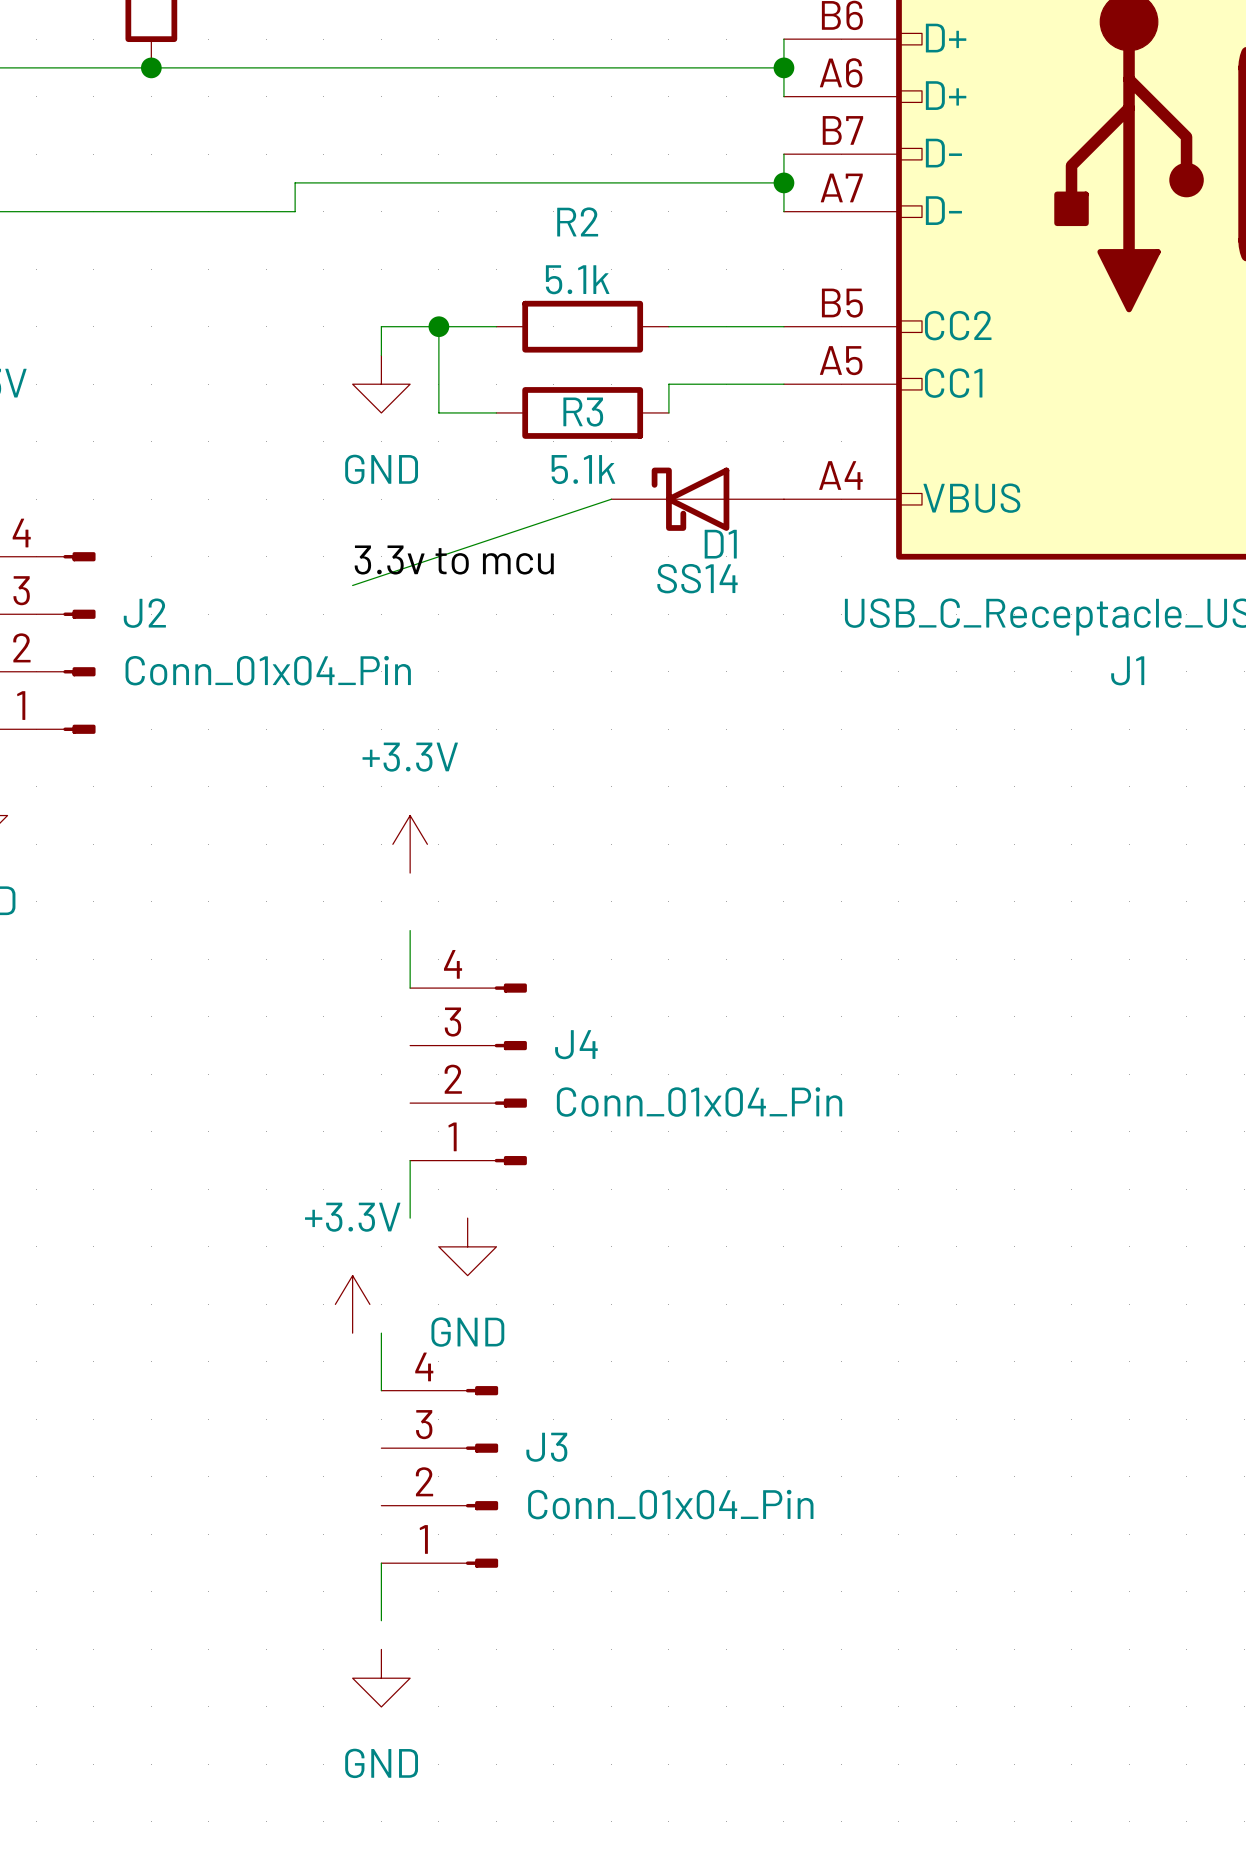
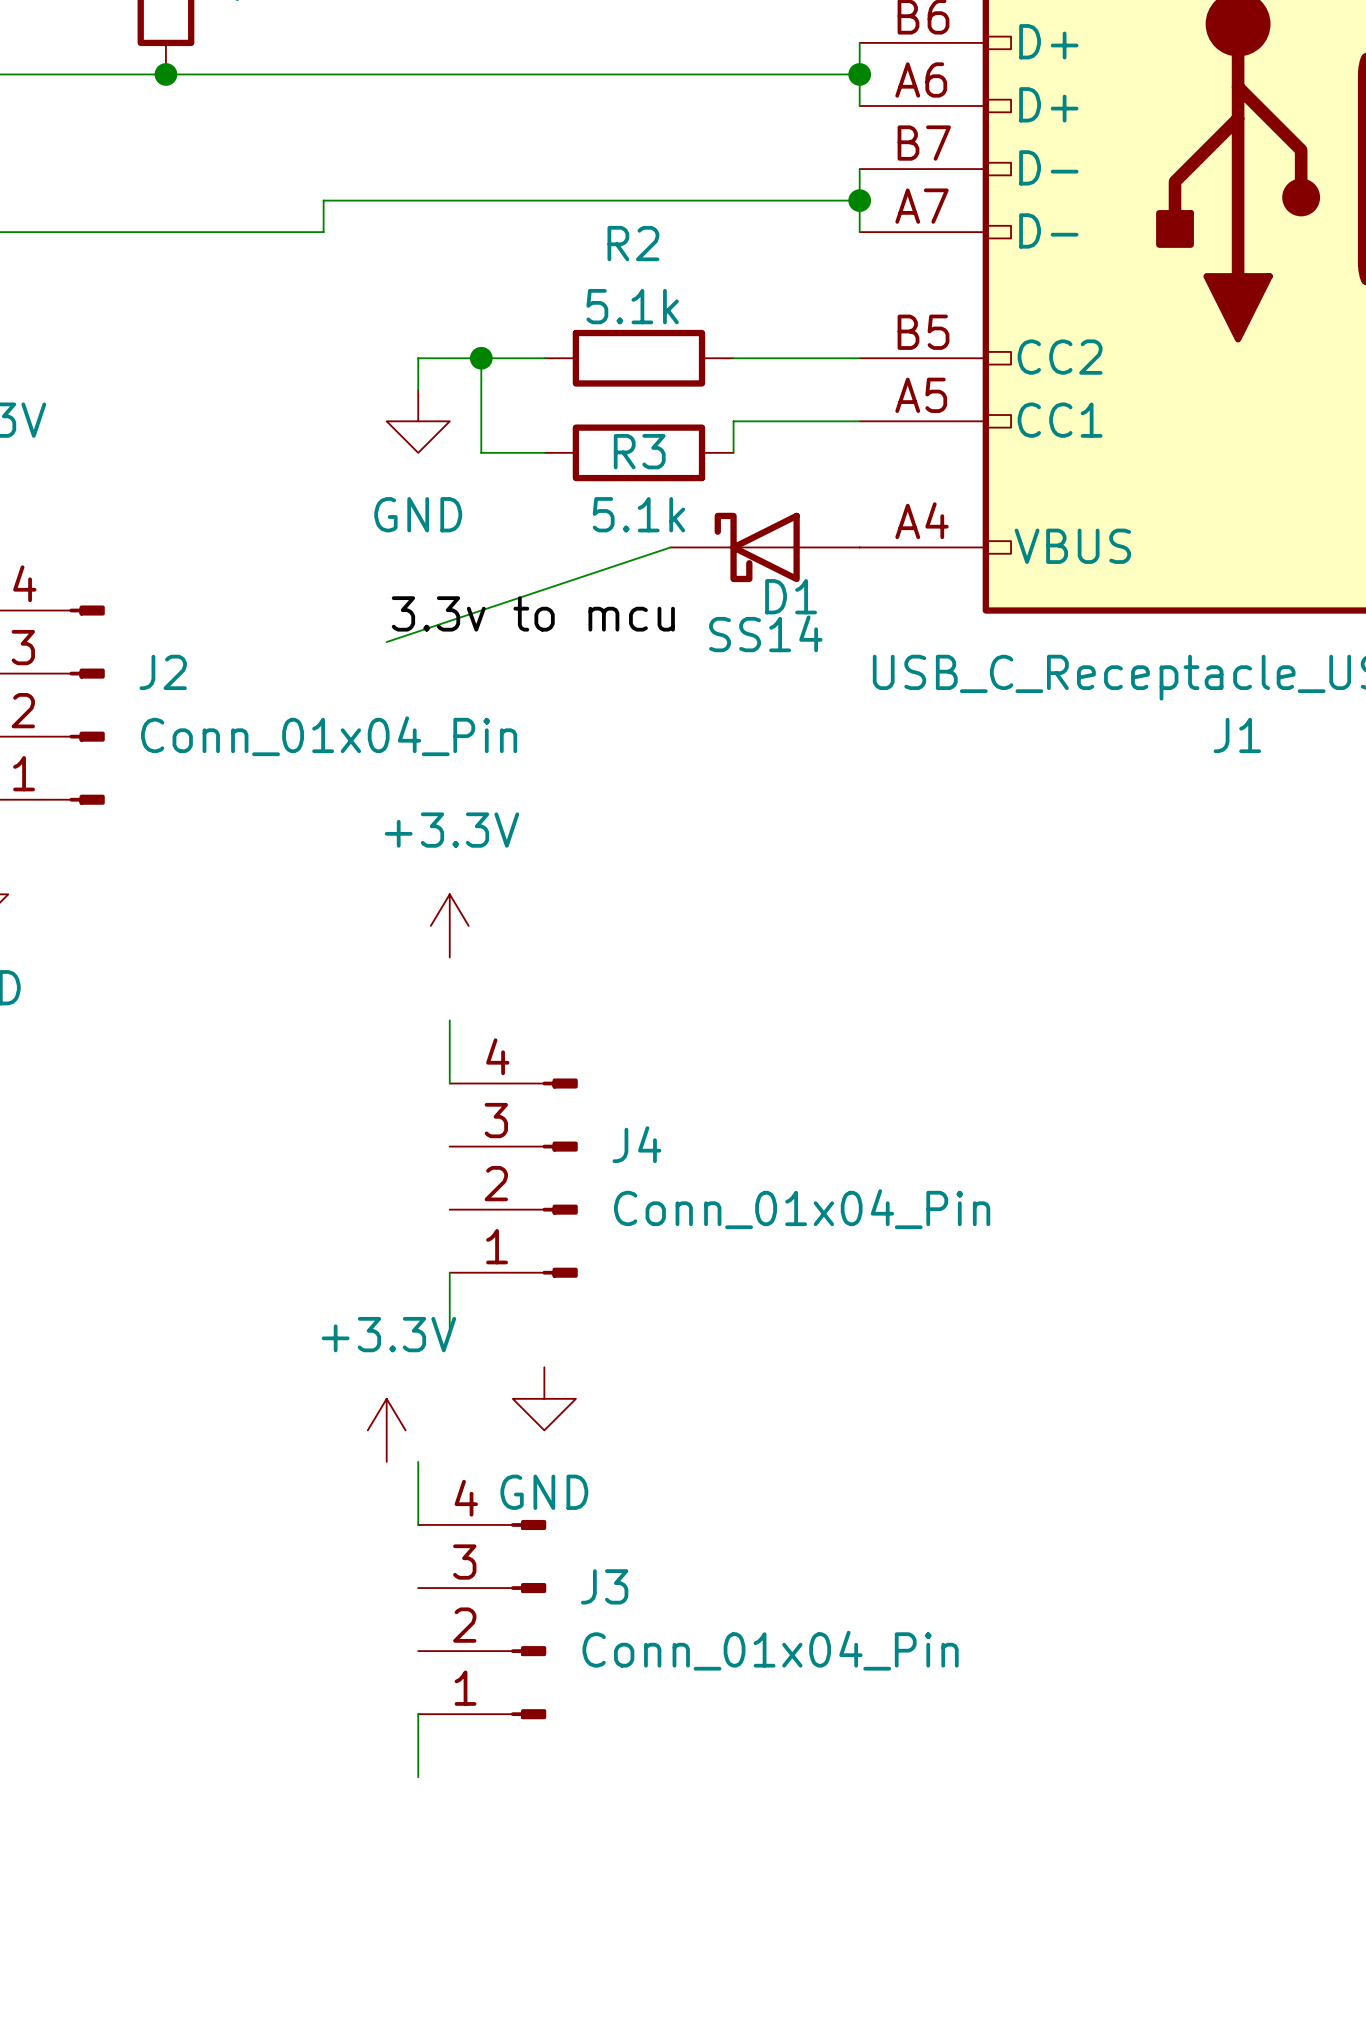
power symbol position: GND (467, 1246) -> GND (544, 1398)
power symbol: GND (381, 1678) -> none

